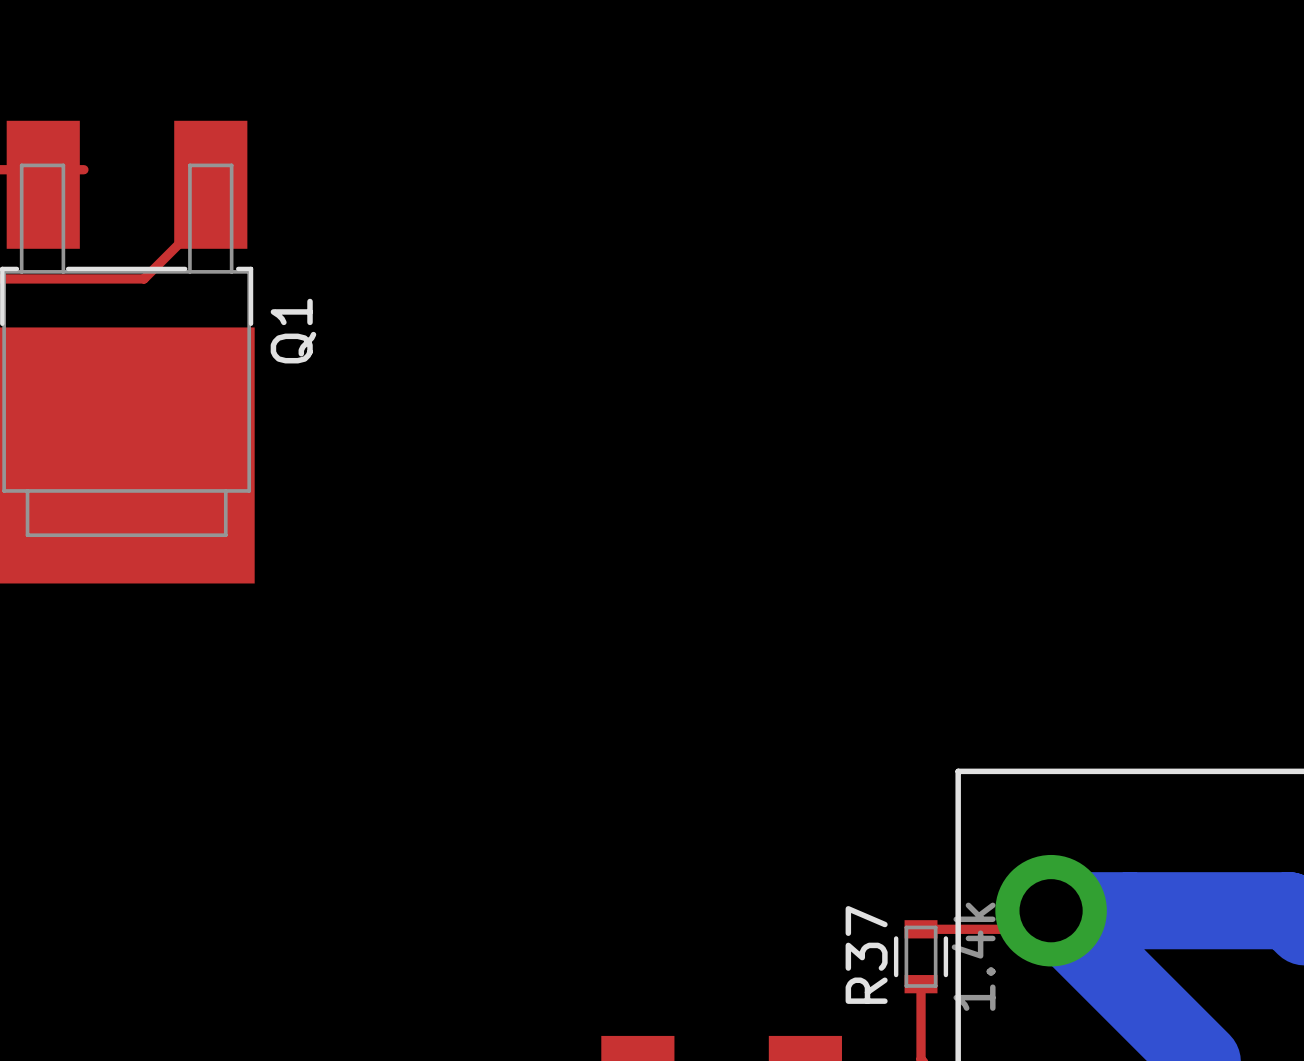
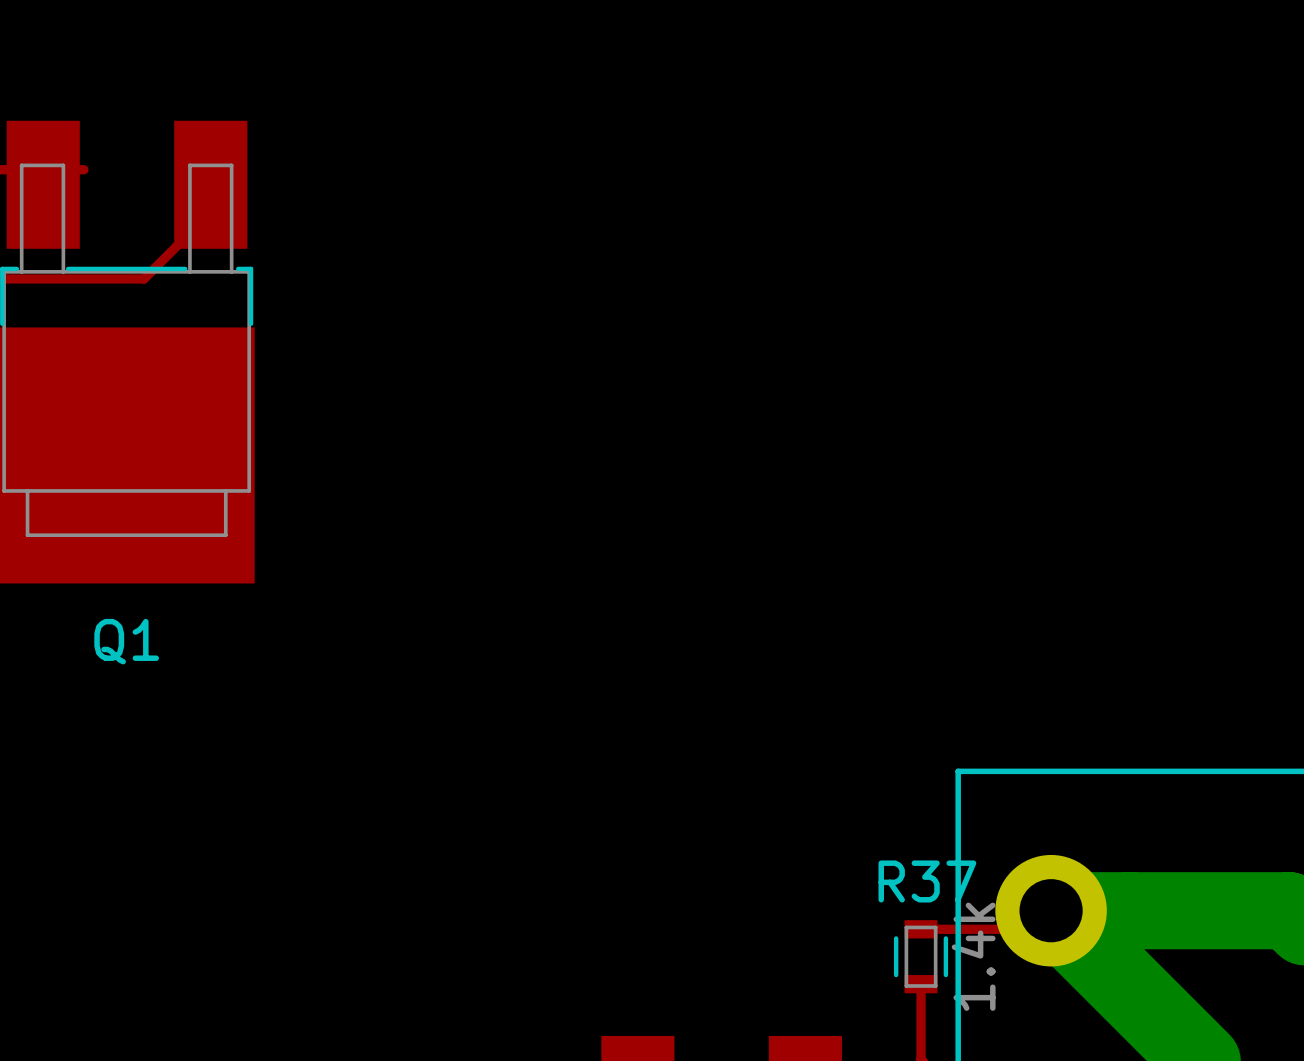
Q1 name rotation: 0° (293, 331) -> 90° clockwise (126, 641)
Q1 name position: Q1 (293, 331) -> Q1 (126, 641)
R37 name rotation: 0° (866, 954) -> 90° clockwise (927, 881)

